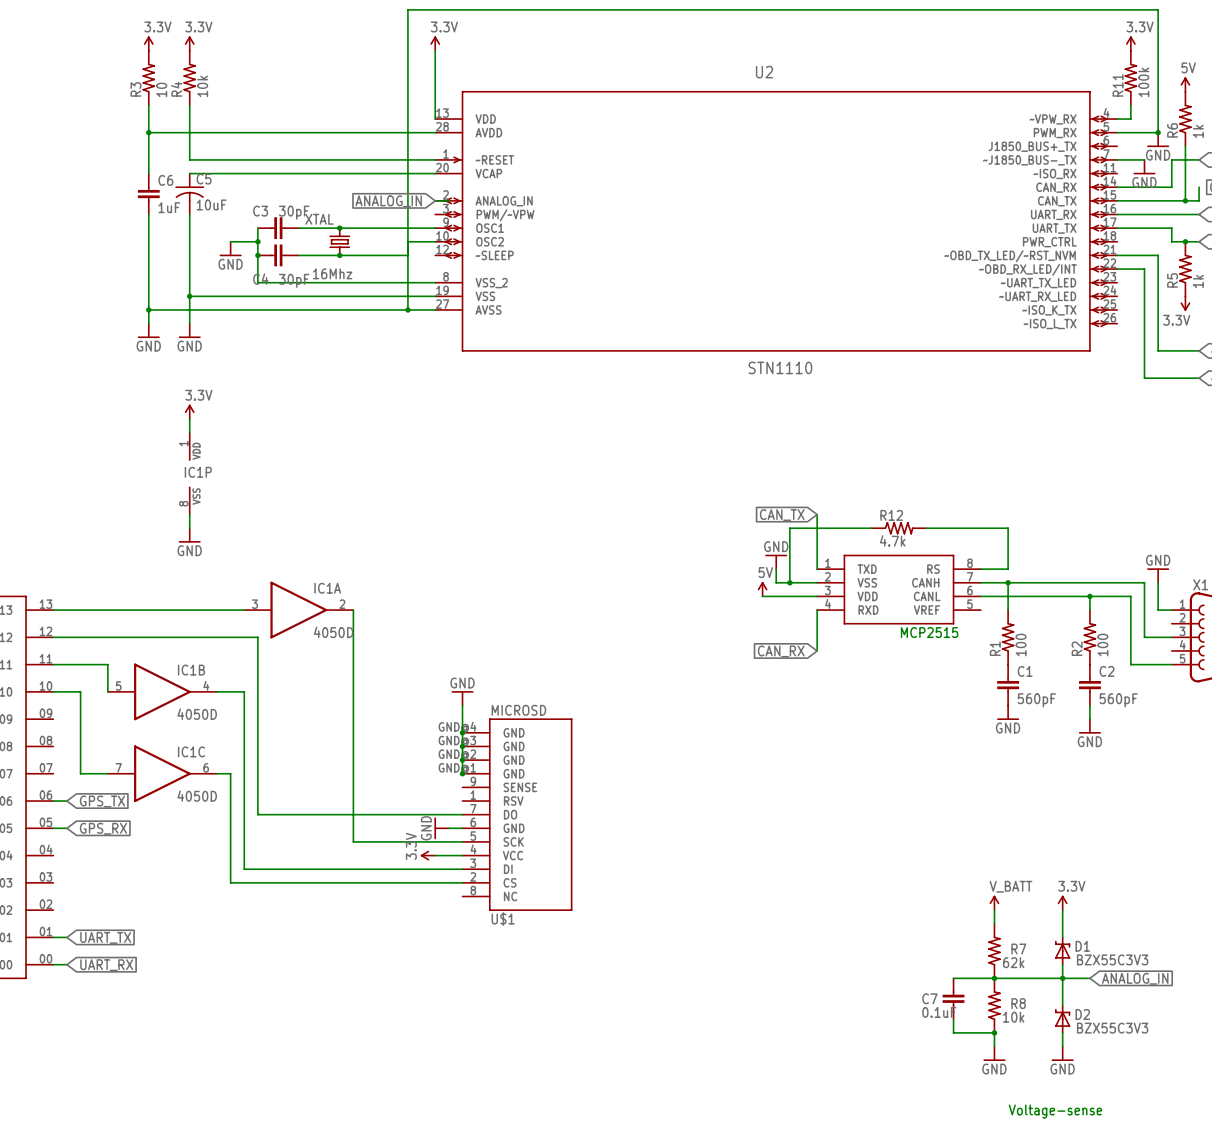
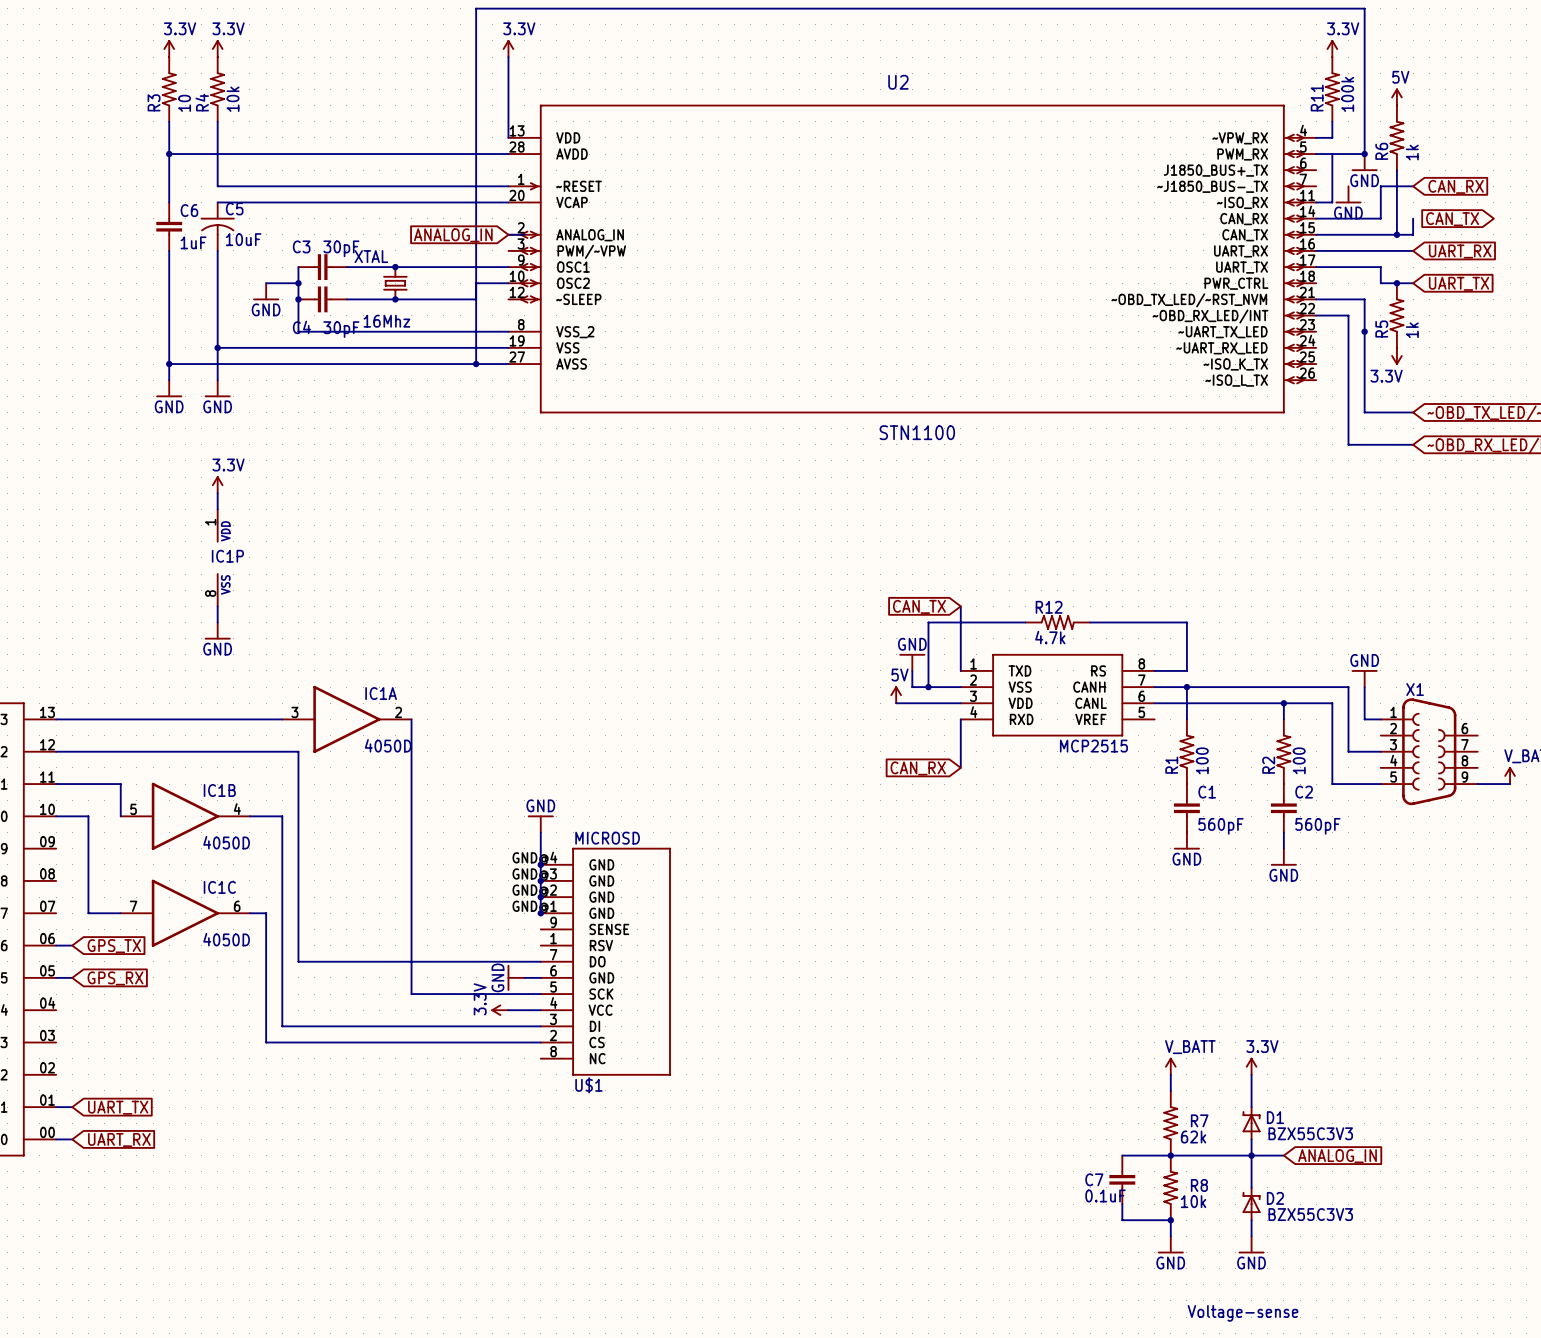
wire: none -> (1332, 154) (1332, 202) (1316, 202)
wire: (1117, 159) (1144, 159) -> none
junction: none -> (1364, 331)
U2 value: STN1110 (780, 367) -> STN1100 (917, 432)

